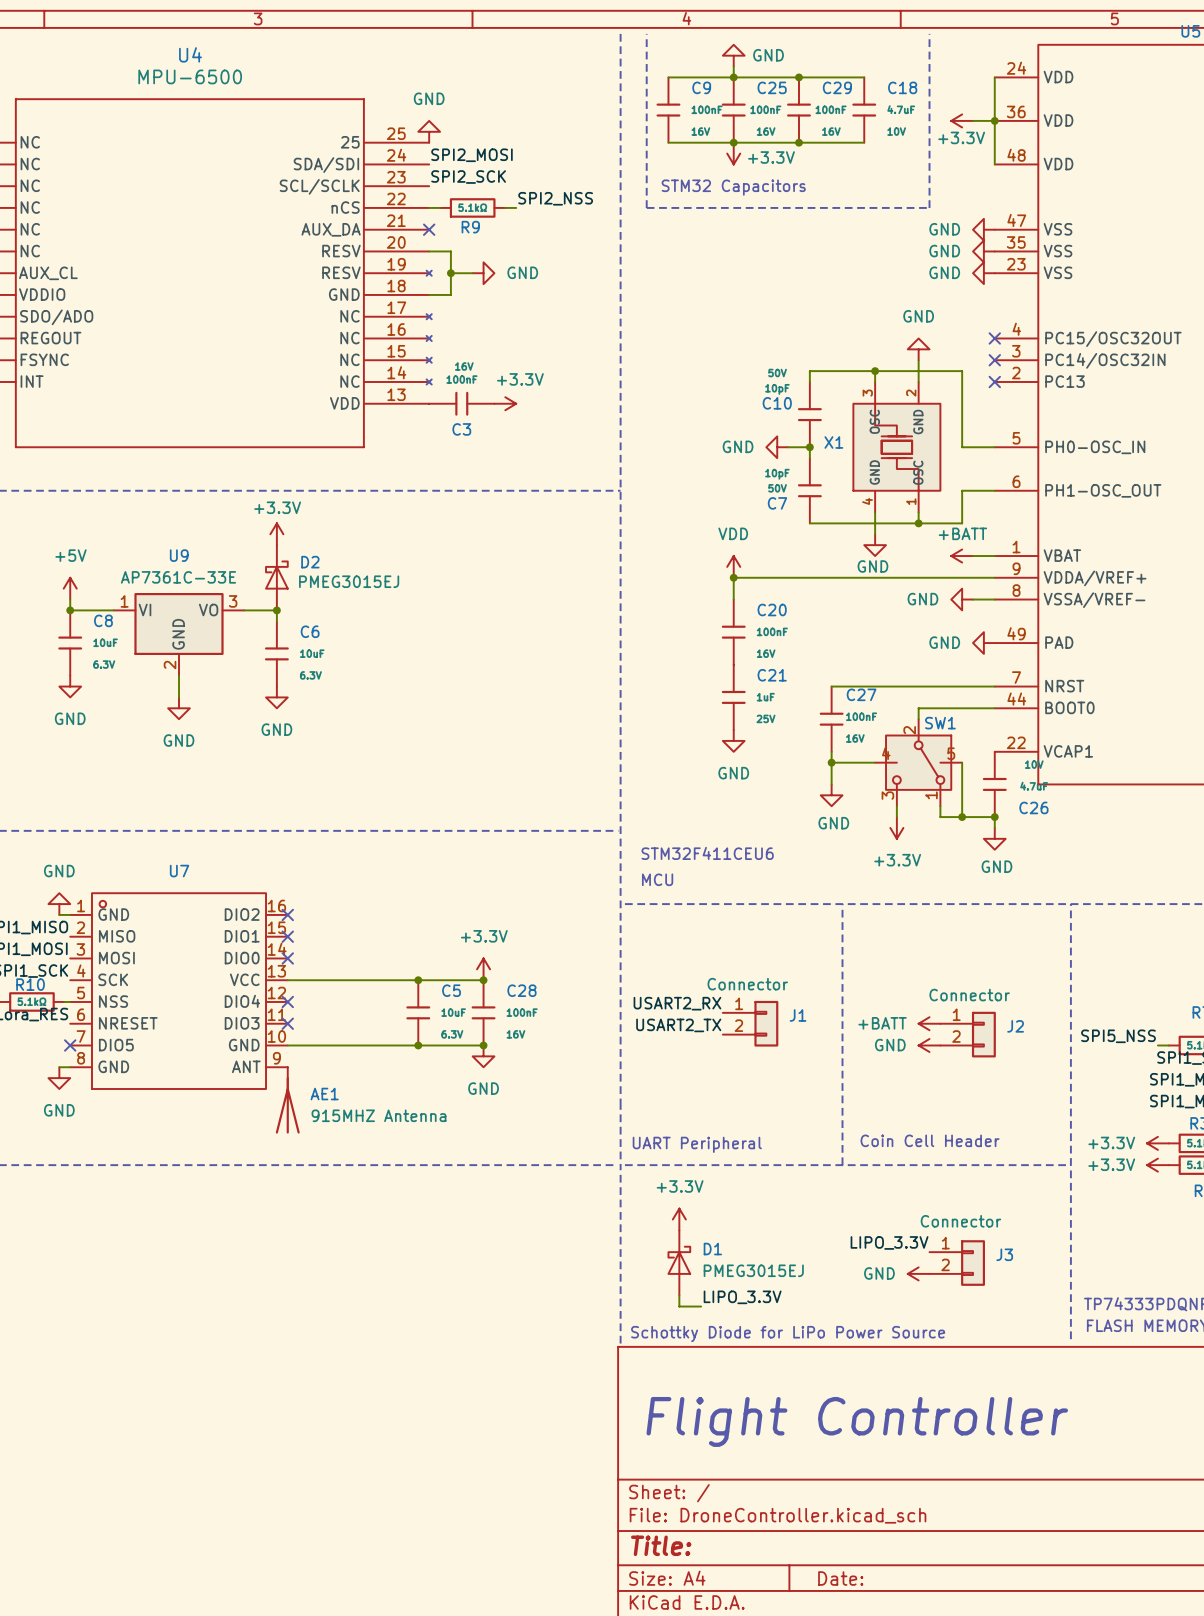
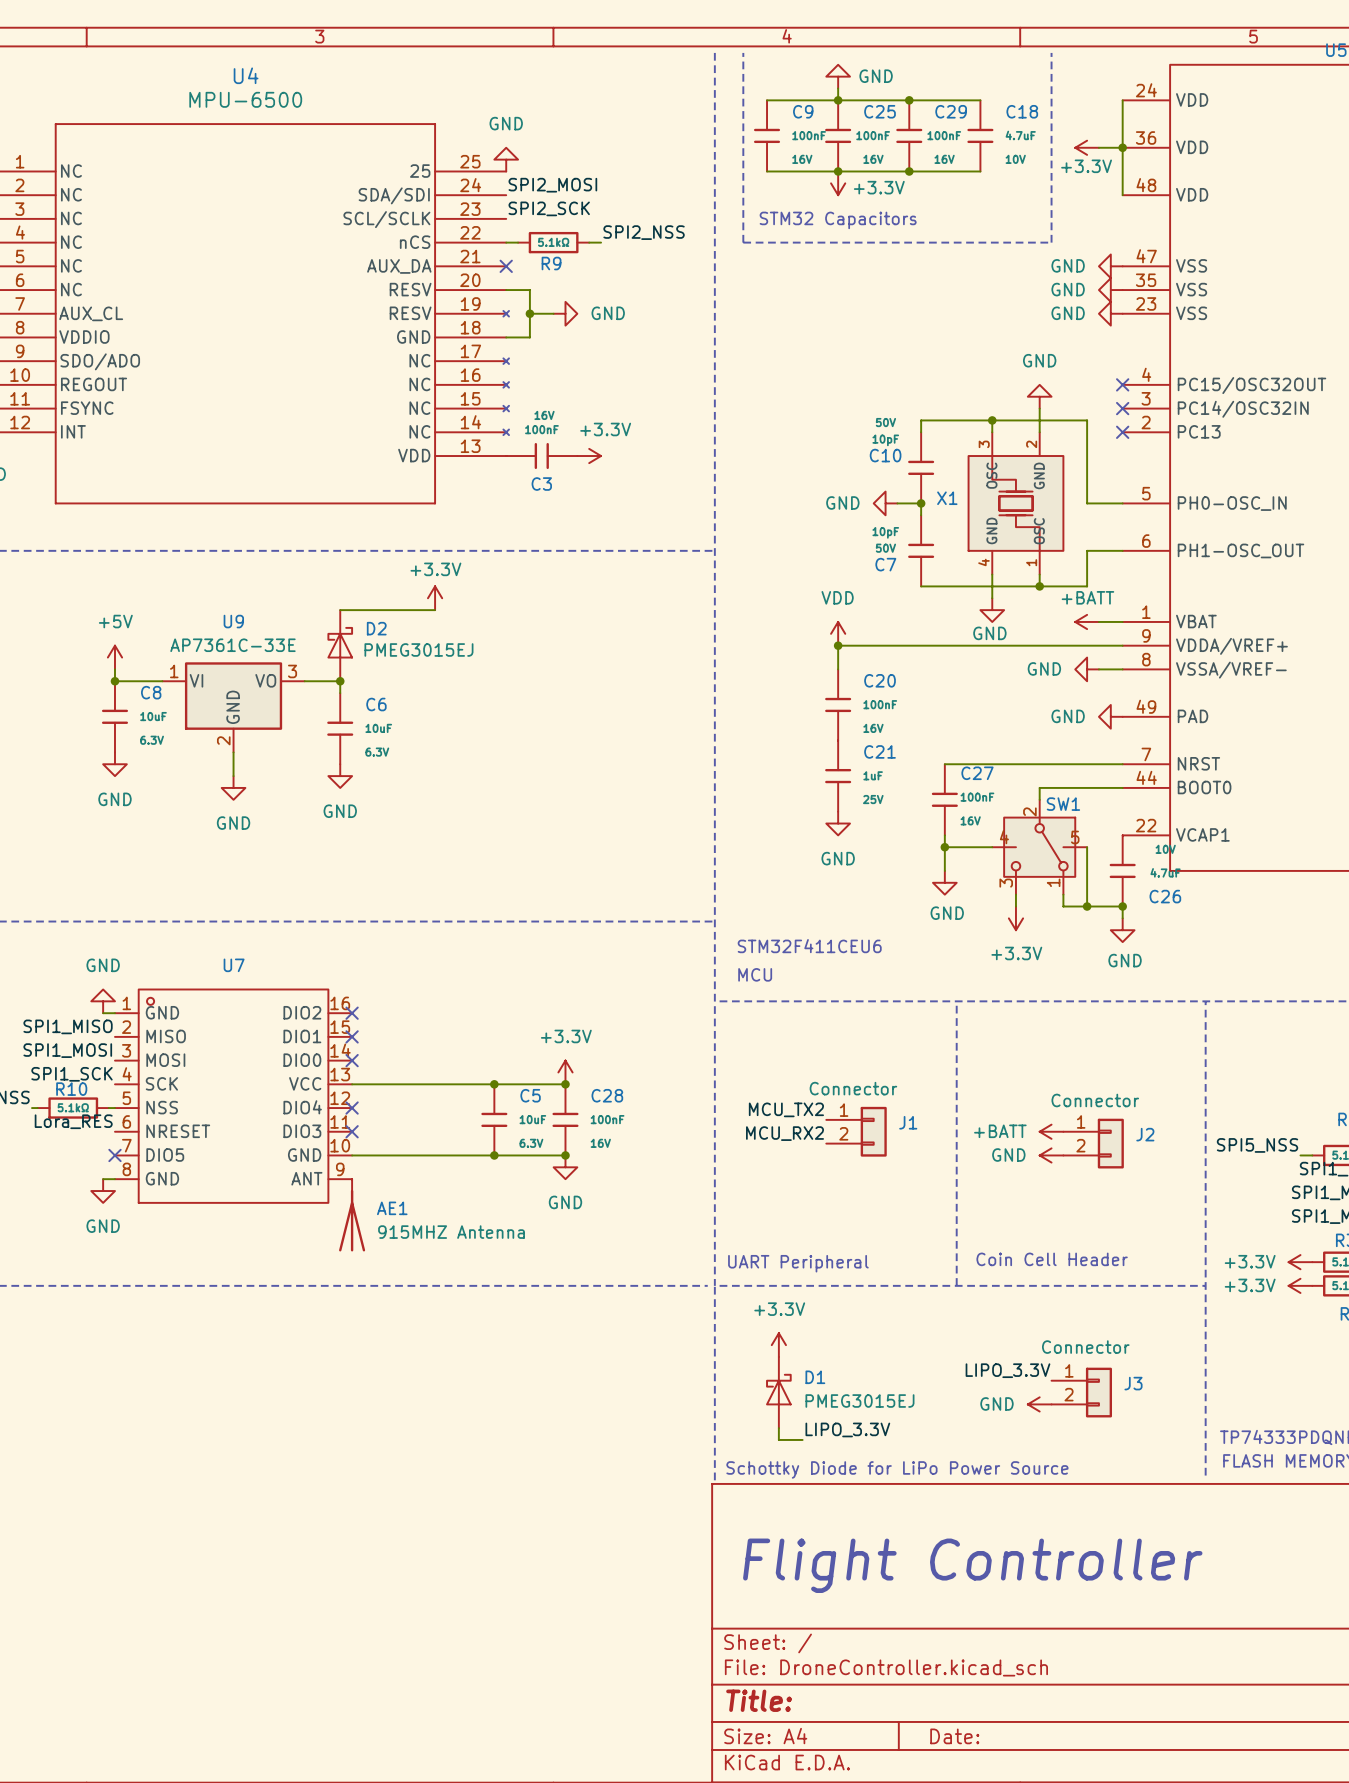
power symbol position: +3.3V (276, 534) -> +3.3V (435, 598)
wire: none -> (340, 610) (435, 610)
label: USART2_RX (677, 1003) -> MCU_TX2 (786, 1109)
label: USART2_TX (678, 1025) -> MCU_RX2 (785, 1133)

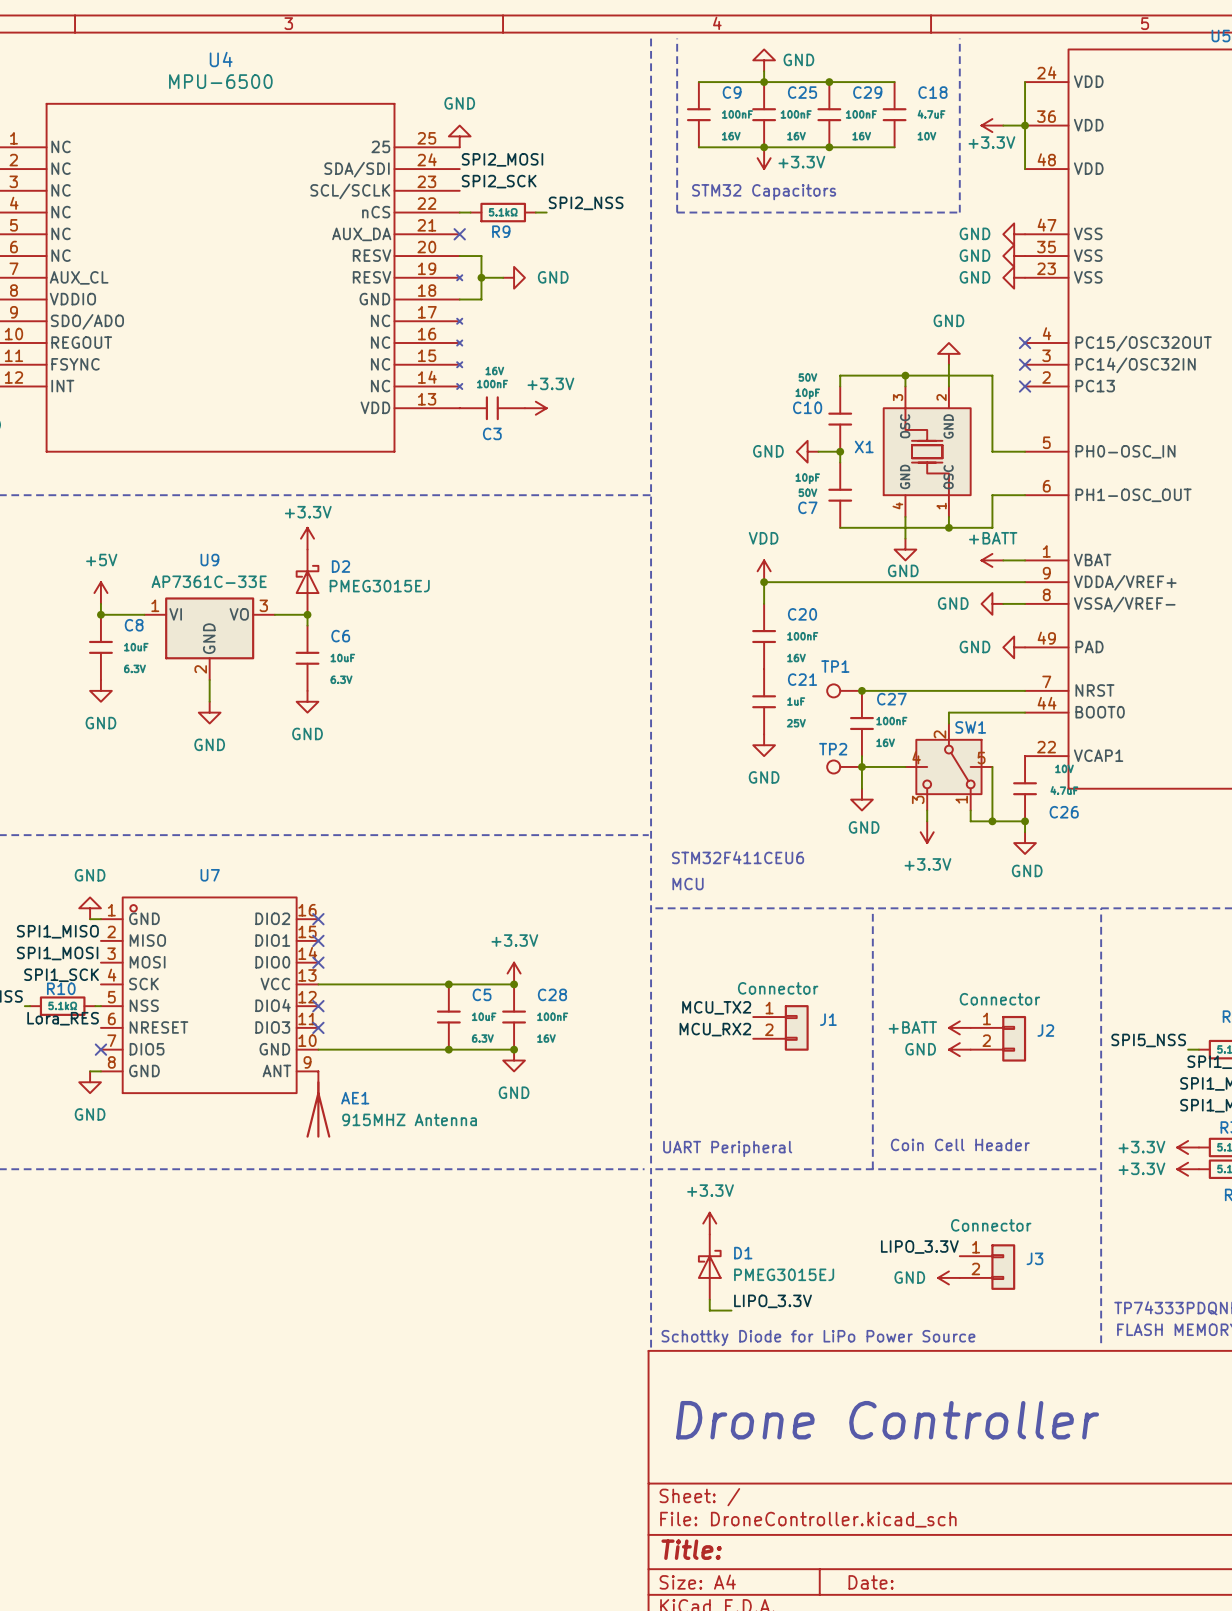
power symbol position: +3.3V (435, 598) -> +3.3V (307, 538)
wire: (340, 610) (435, 610) -> none
TP1: none -> (844, 690)
junction: none -> (861, 690)
TP2: none -> (844, 766)
text: Flight Controller (972, 1565) -> Drone Controller (887, 1420)

